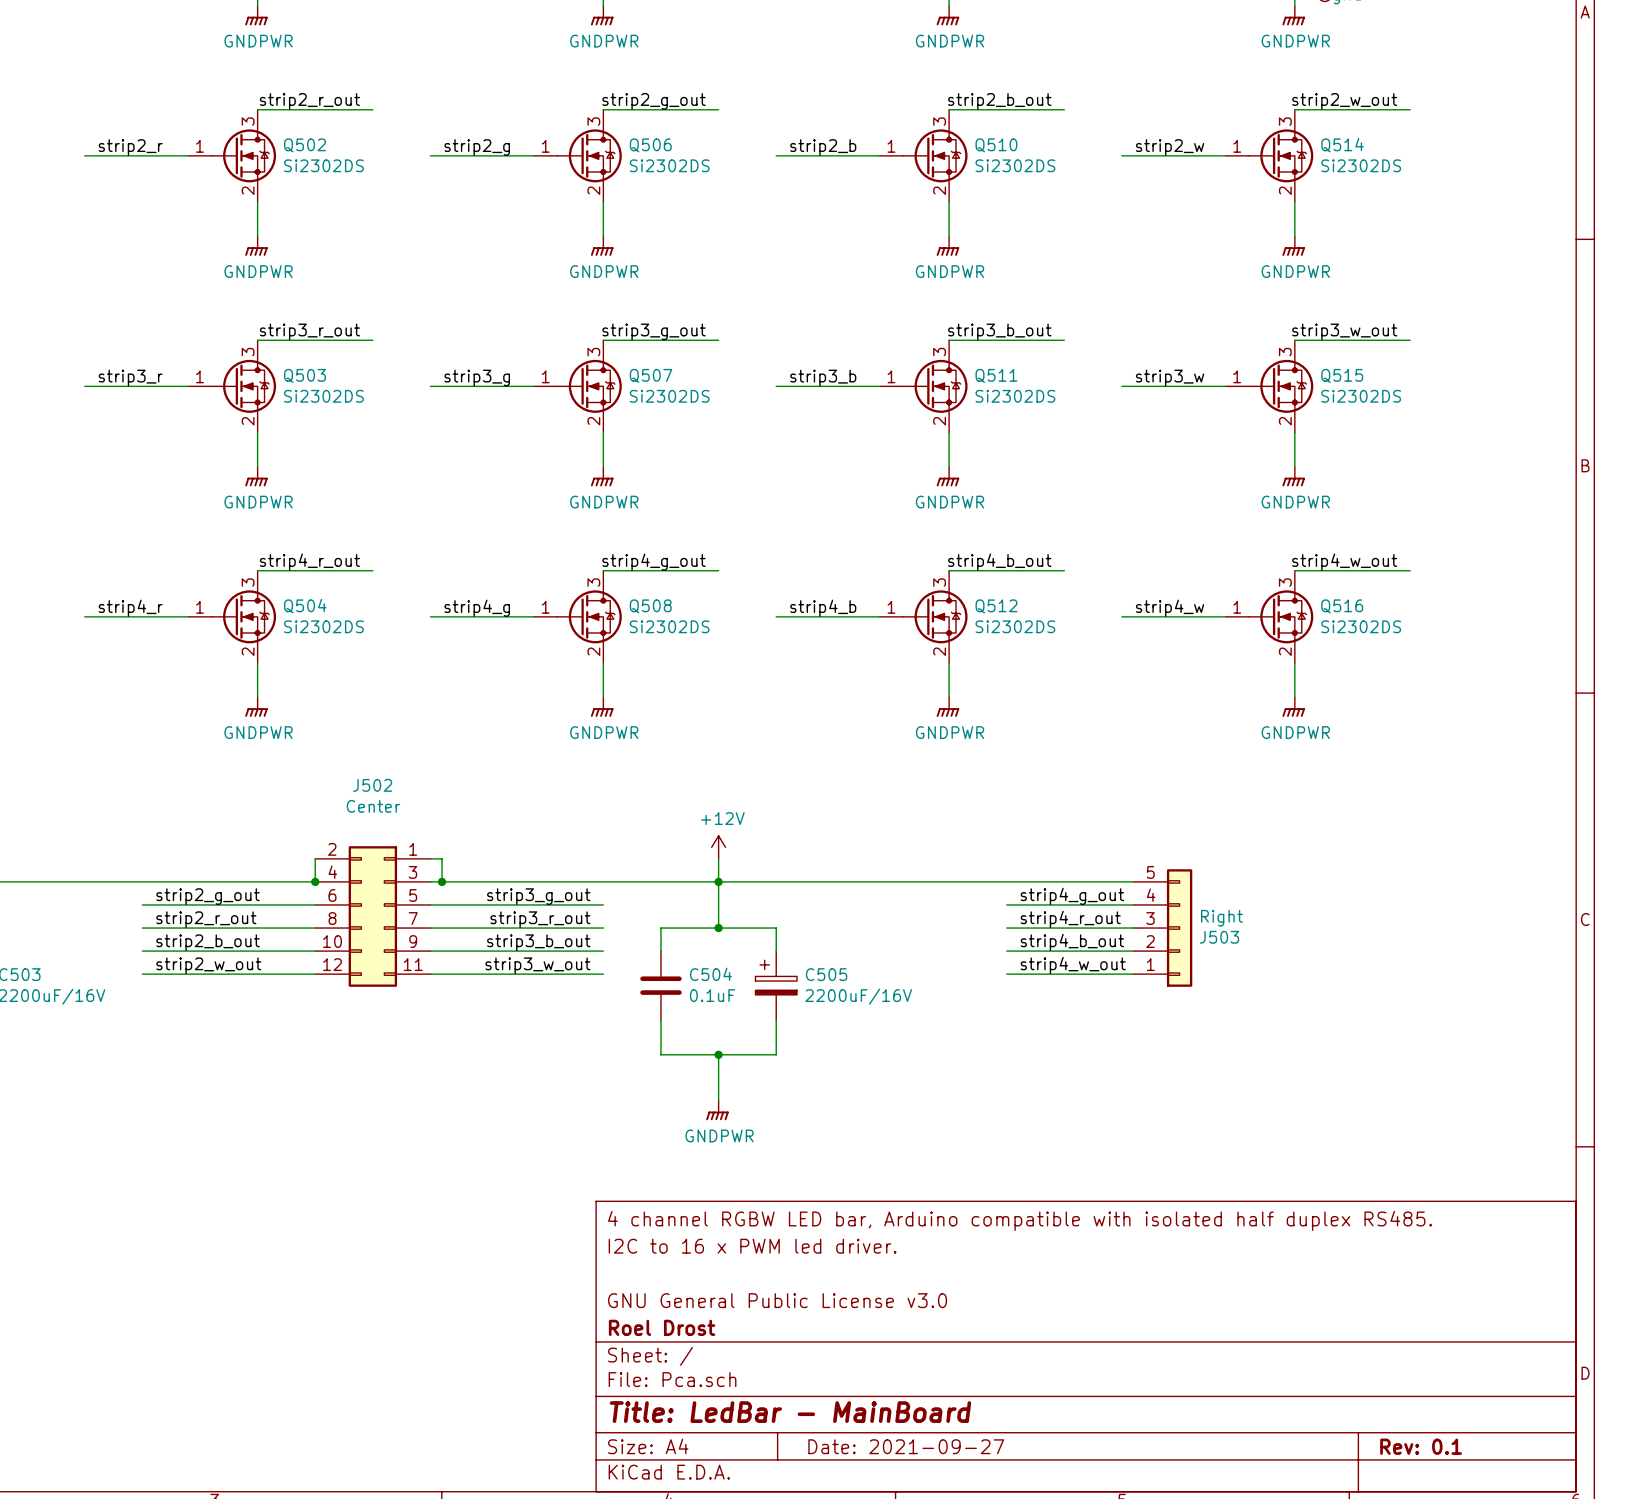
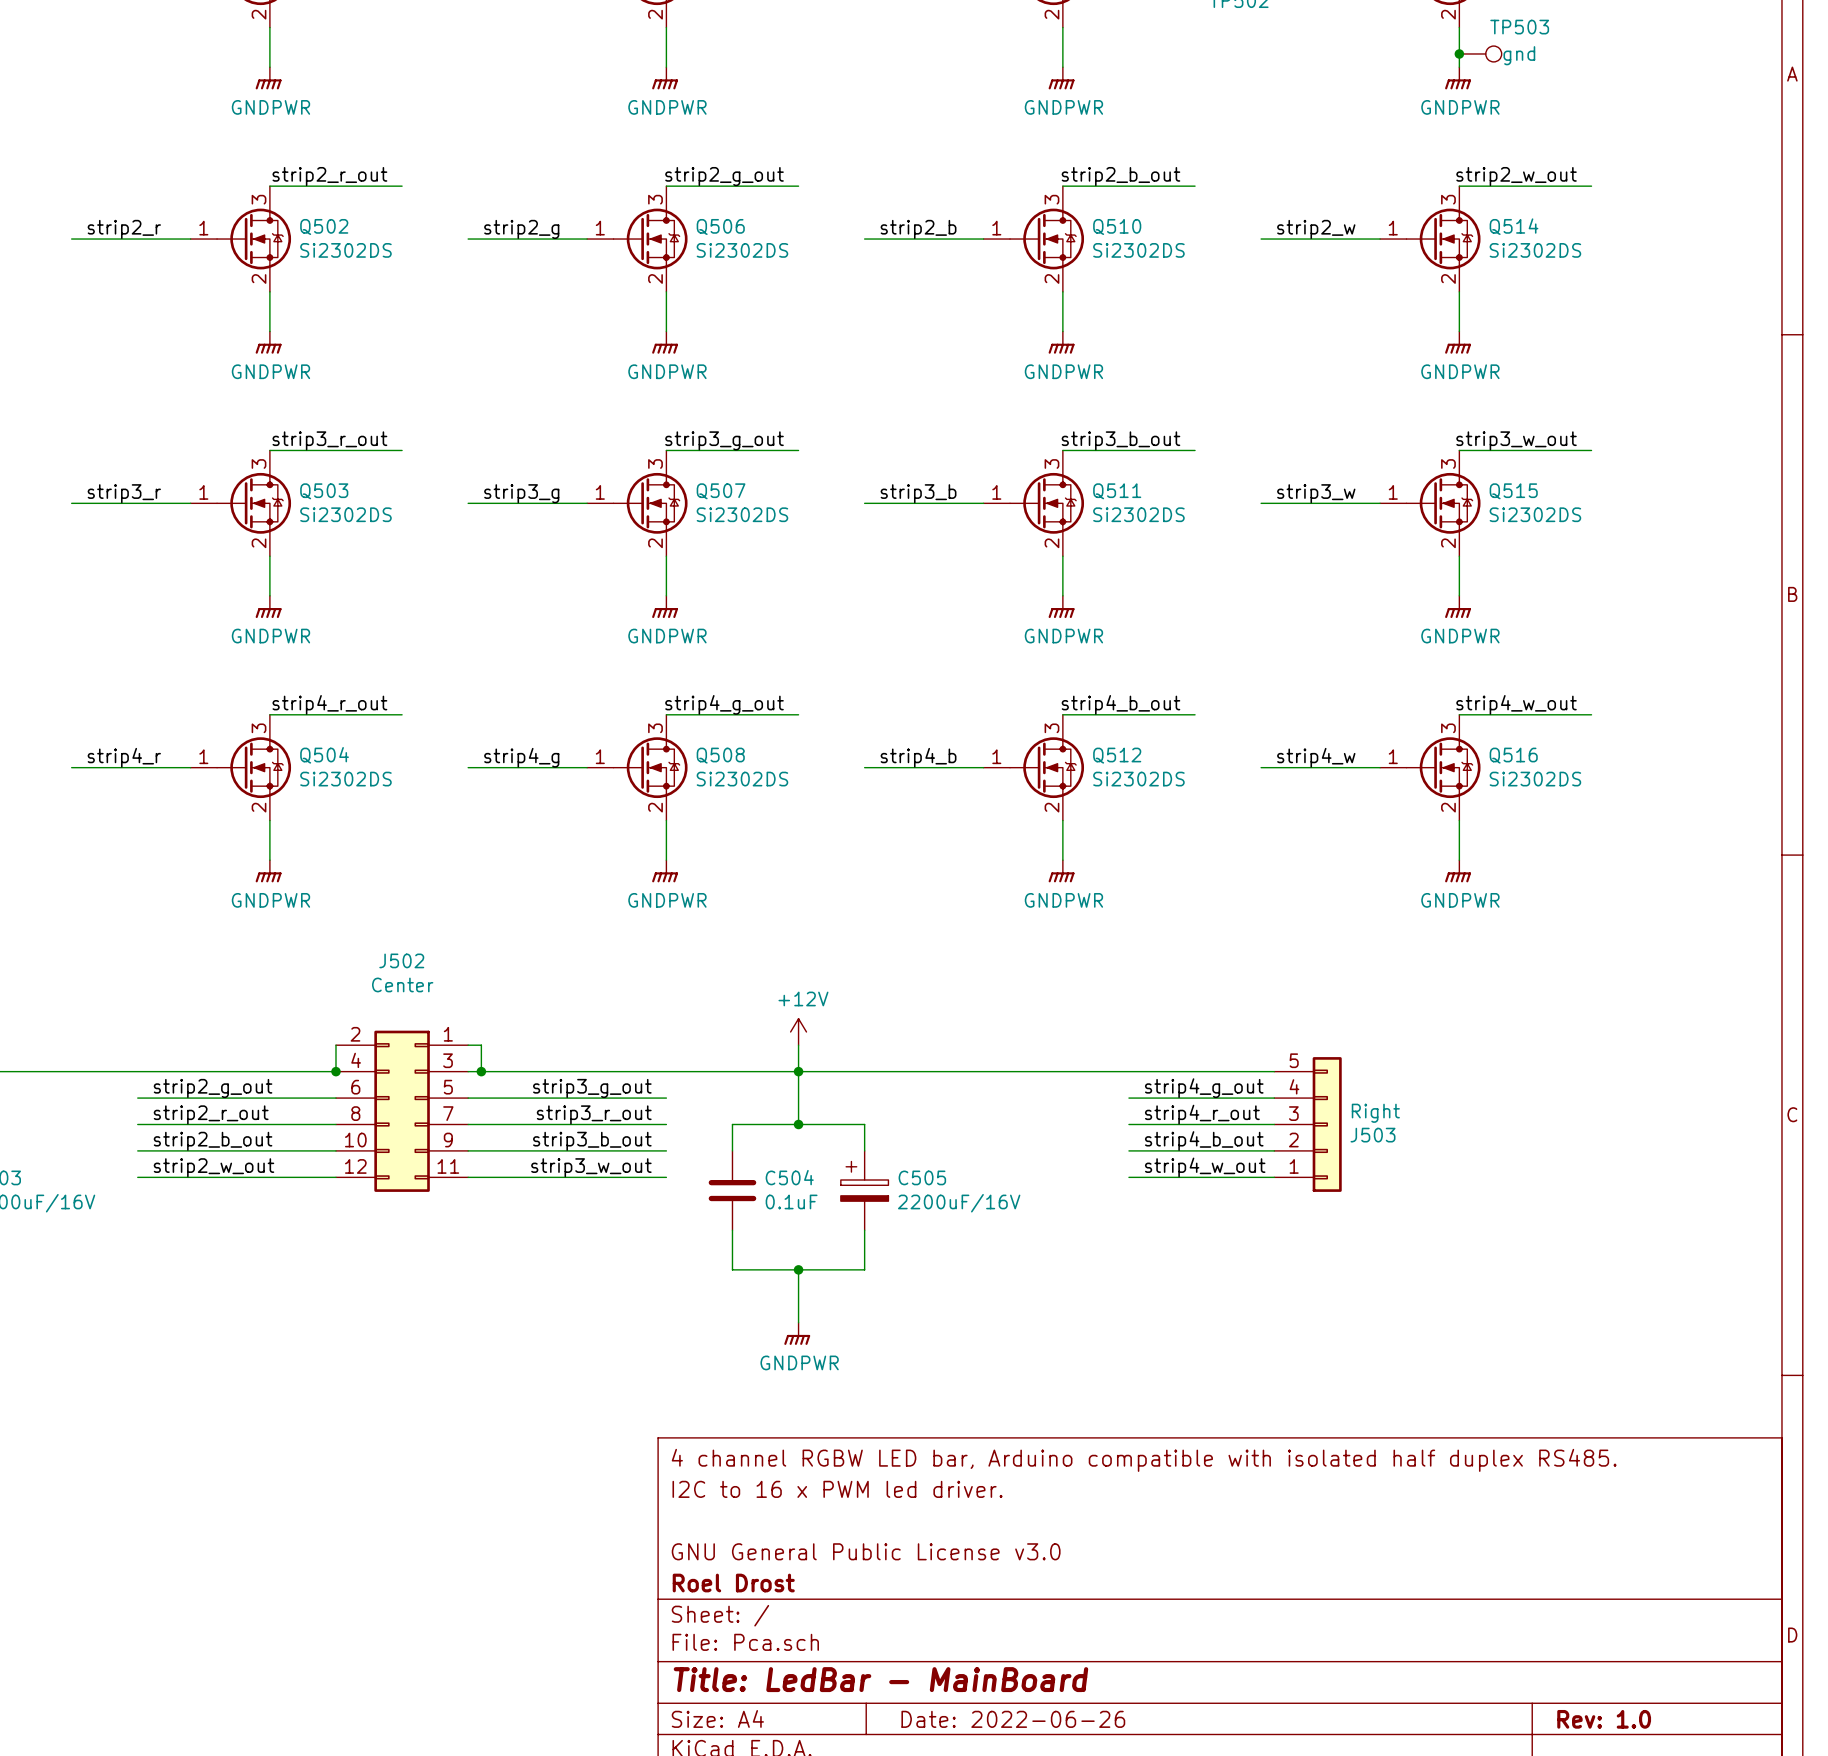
title block: Date: 2021-09-27 (906, 1446) -> Date: 2022-06-26 (1013, 1719)
title block: Rev: 0.1 (1421, 1446) -> Rev: 1.0 (1604, 1719)

